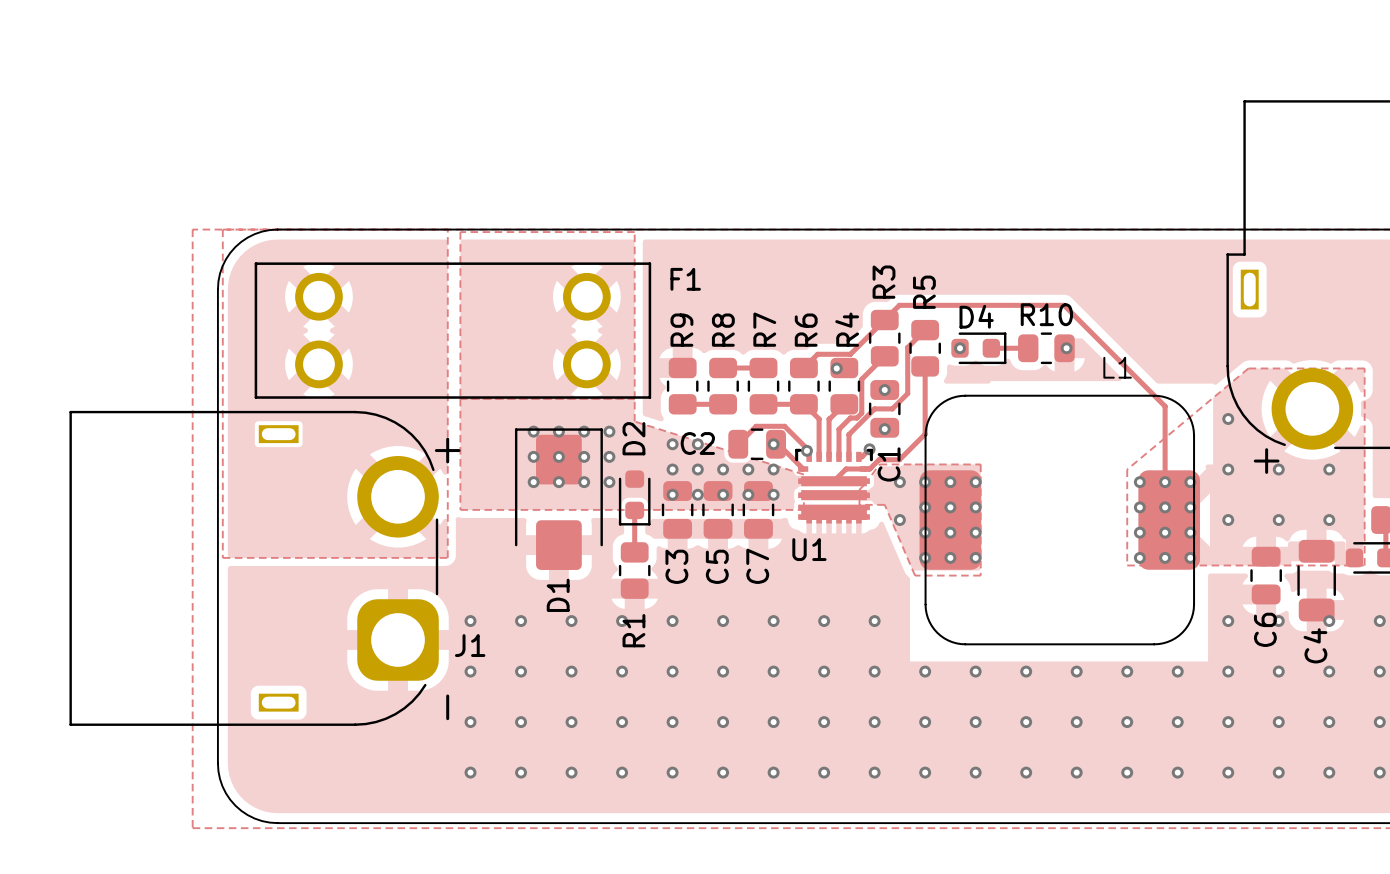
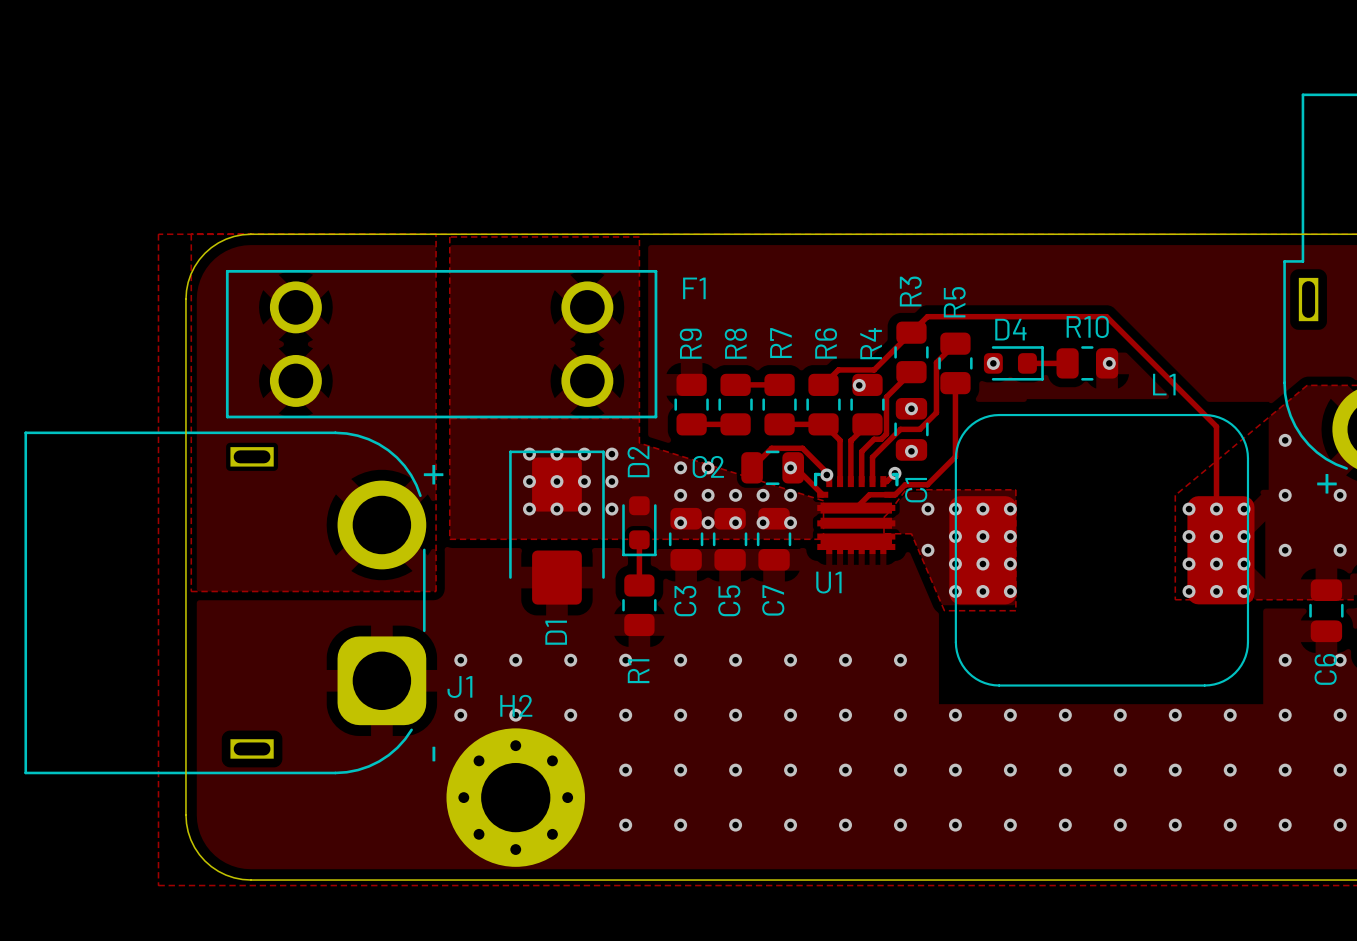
via: (470, 722) -> none
via: (521, 722) -> none
via: (571, 722) -> none
H2: none -> (515, 797)
via: (470, 772) -> none
via: (521, 772) -> none
via: (571, 772) -> none

